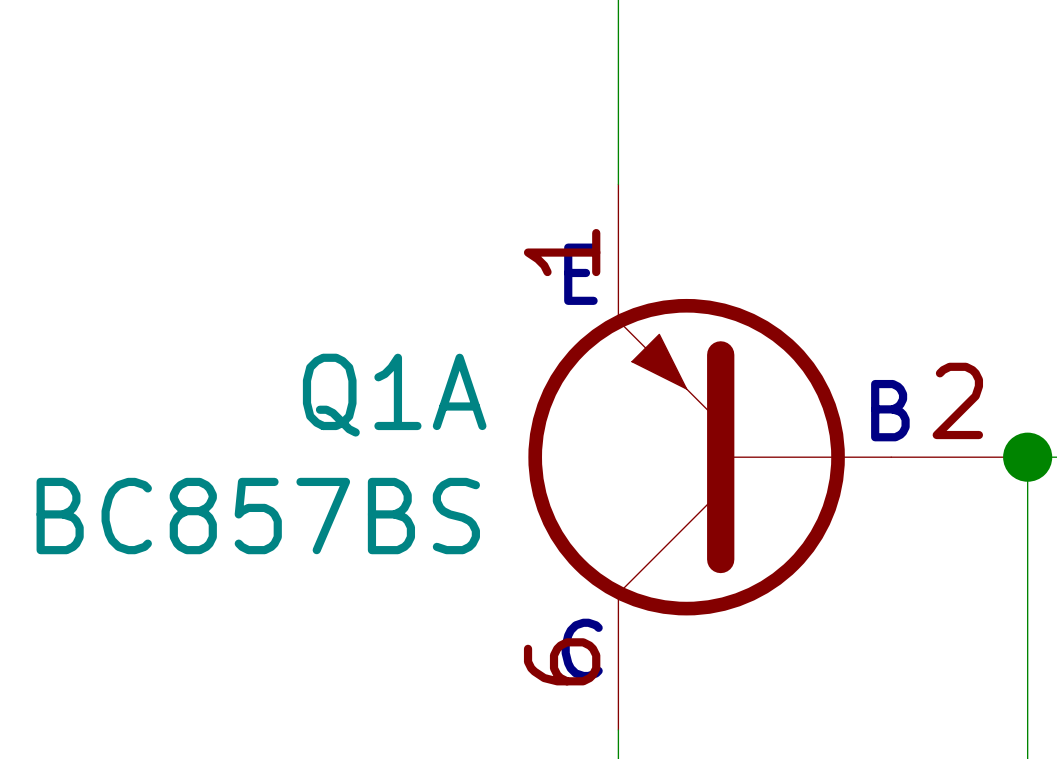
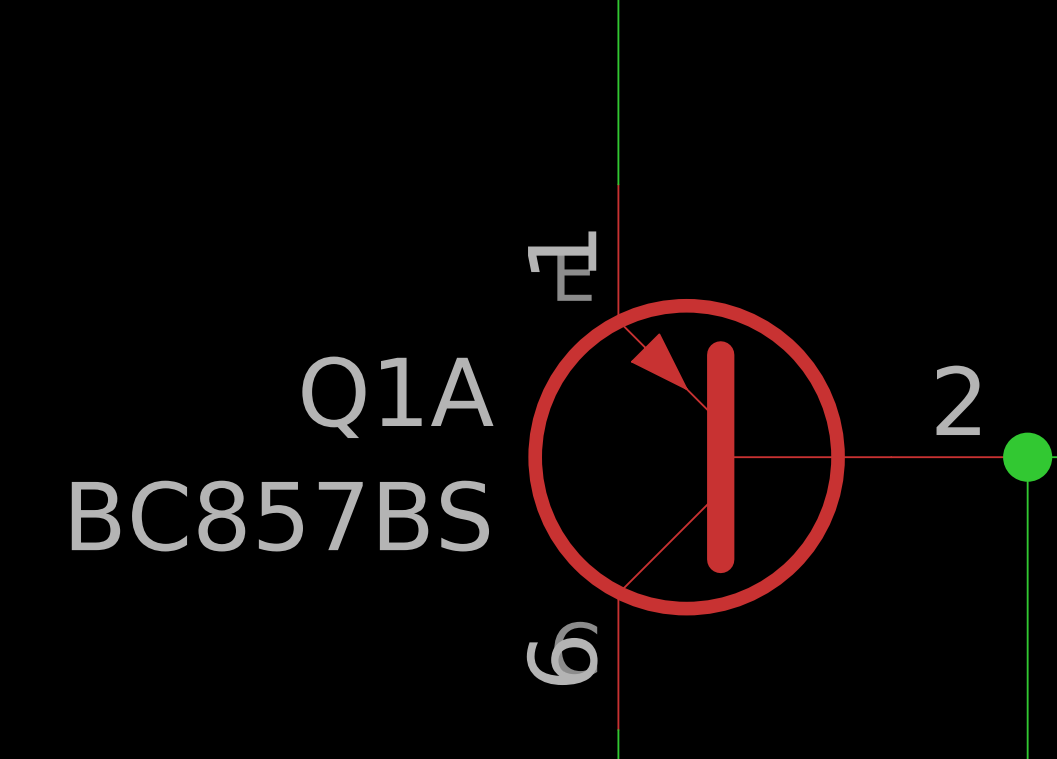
text: B (890, 410) -> none

